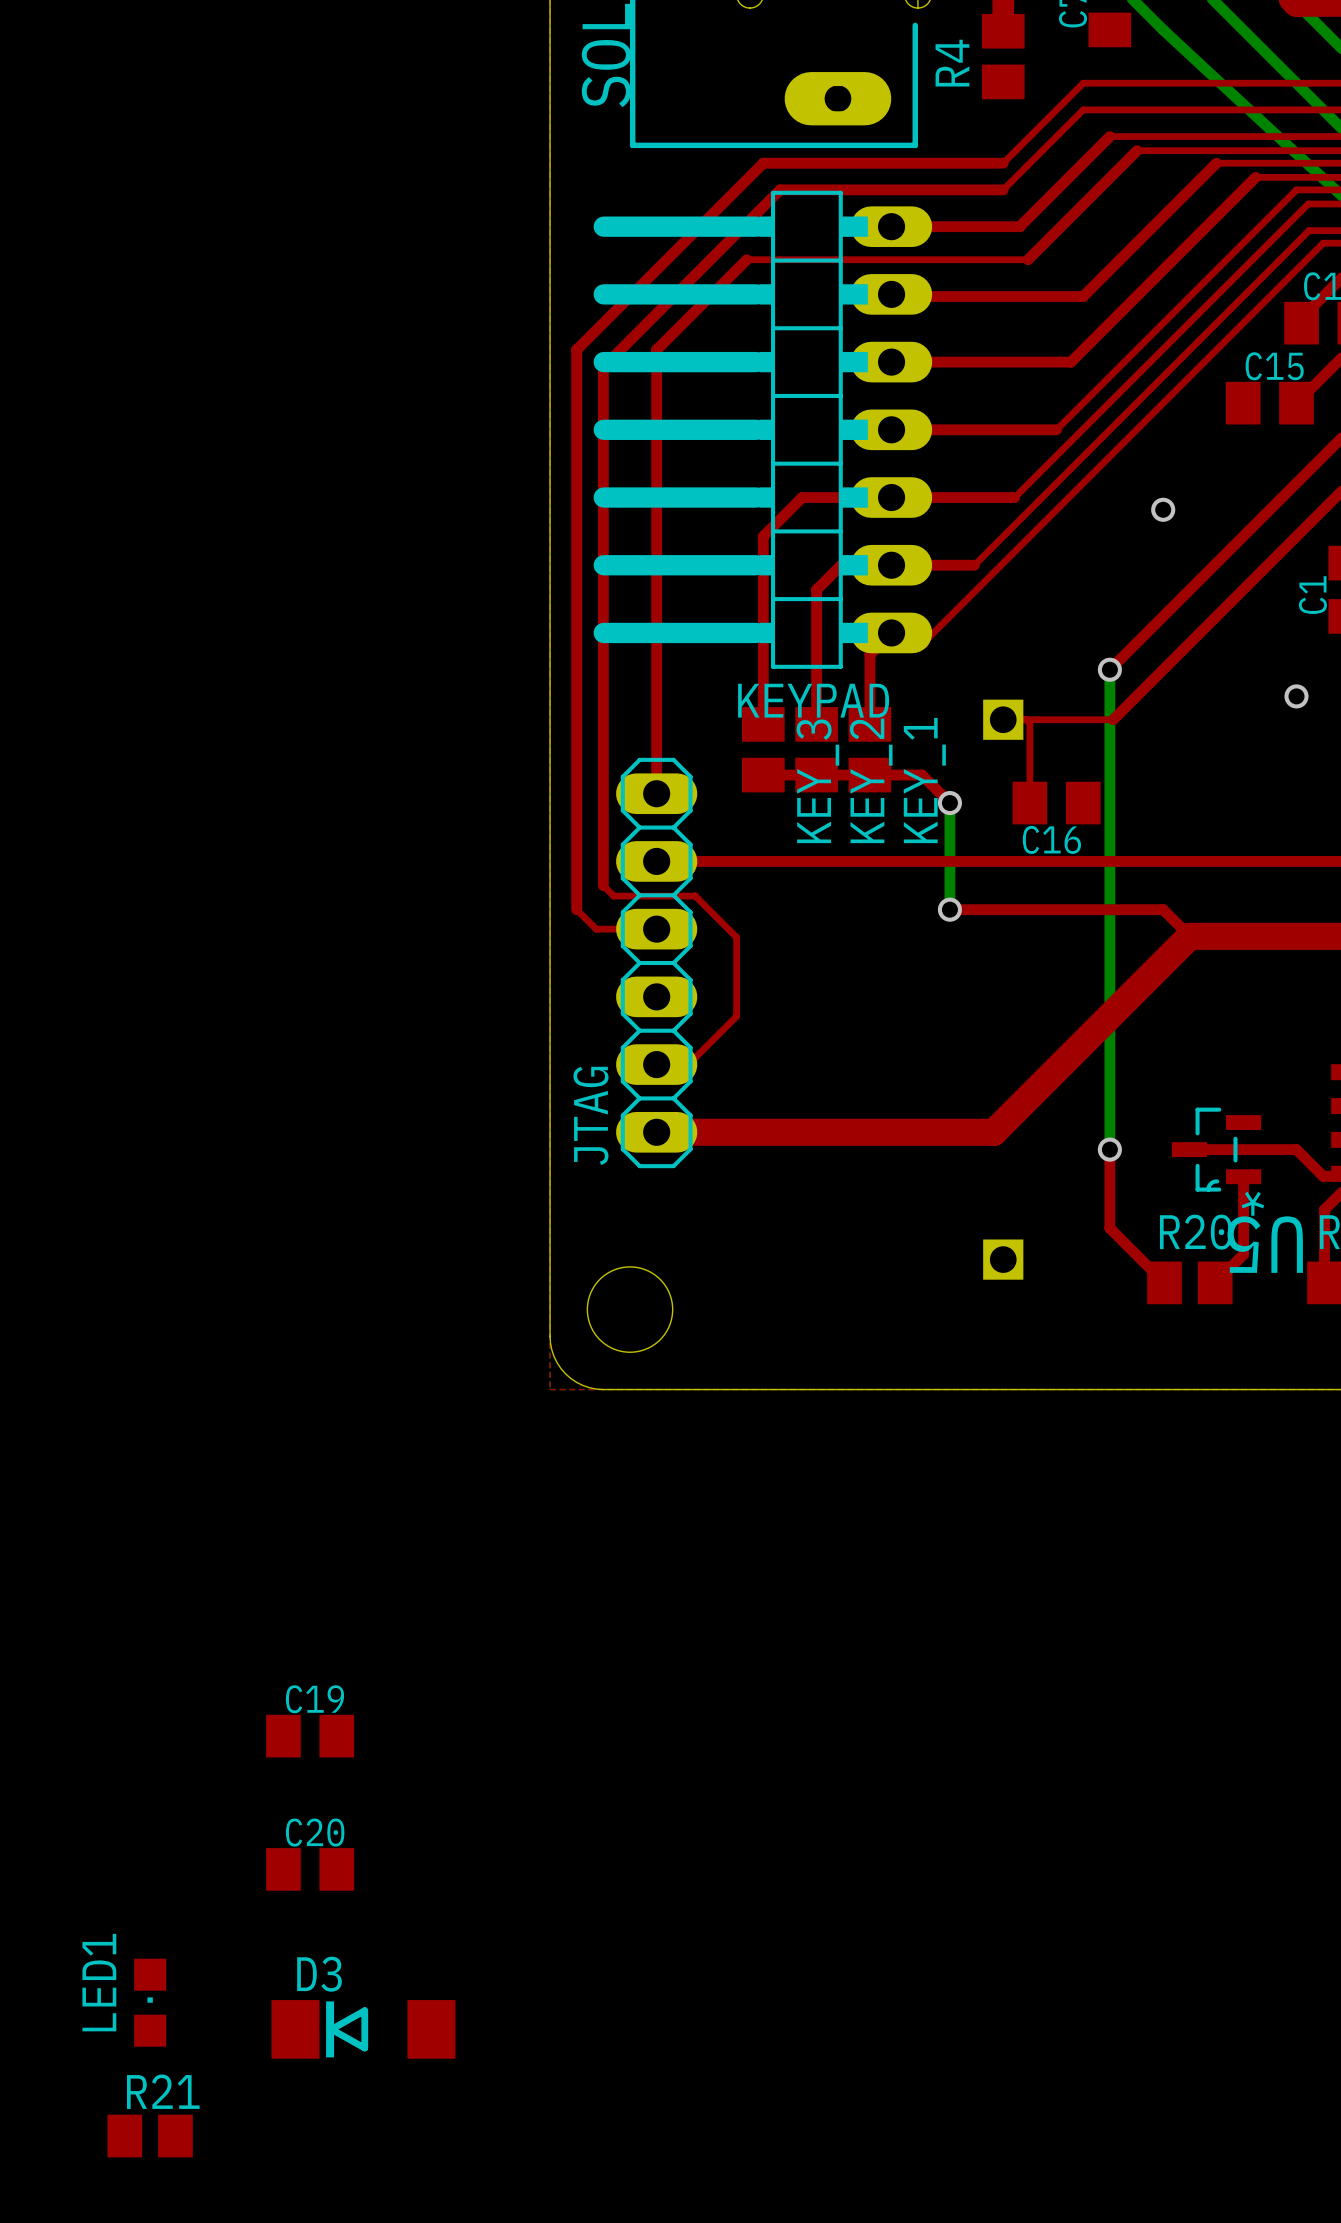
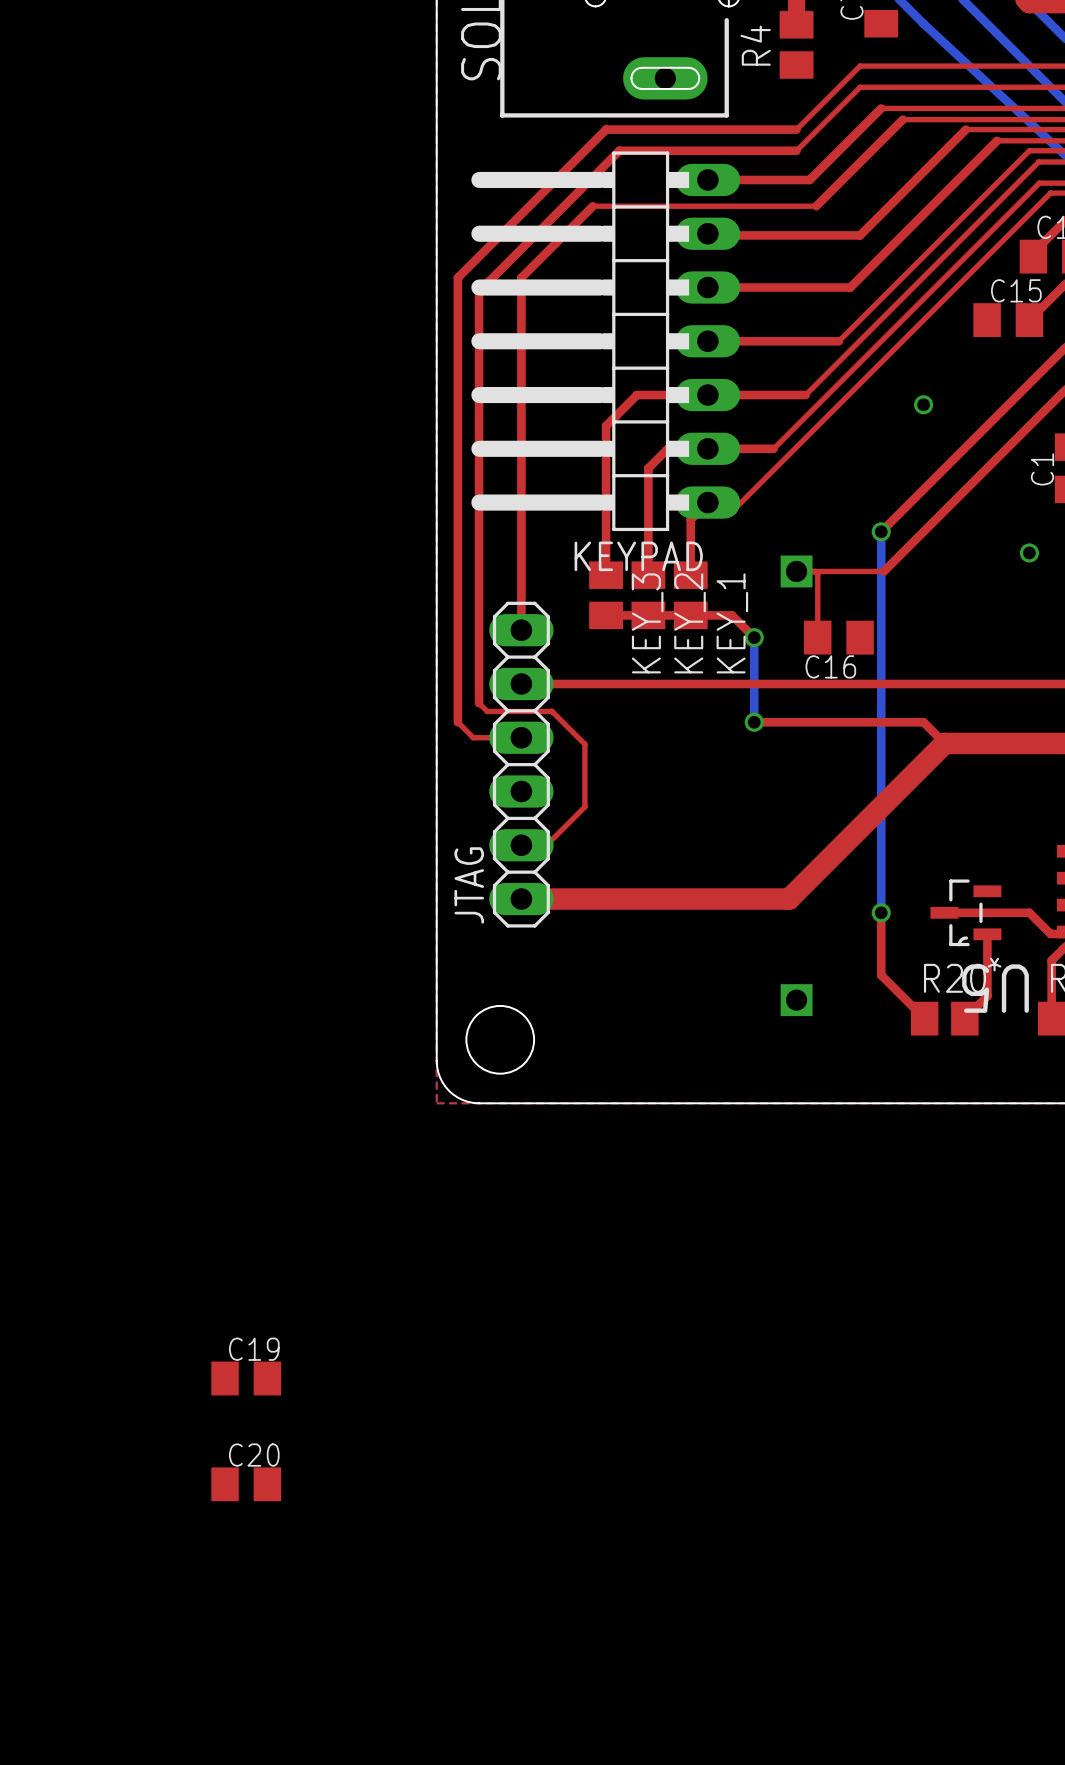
LED1: (150, 2002) -> none
D3: (363, 2029) -> none
R21: (150, 2136) -> none

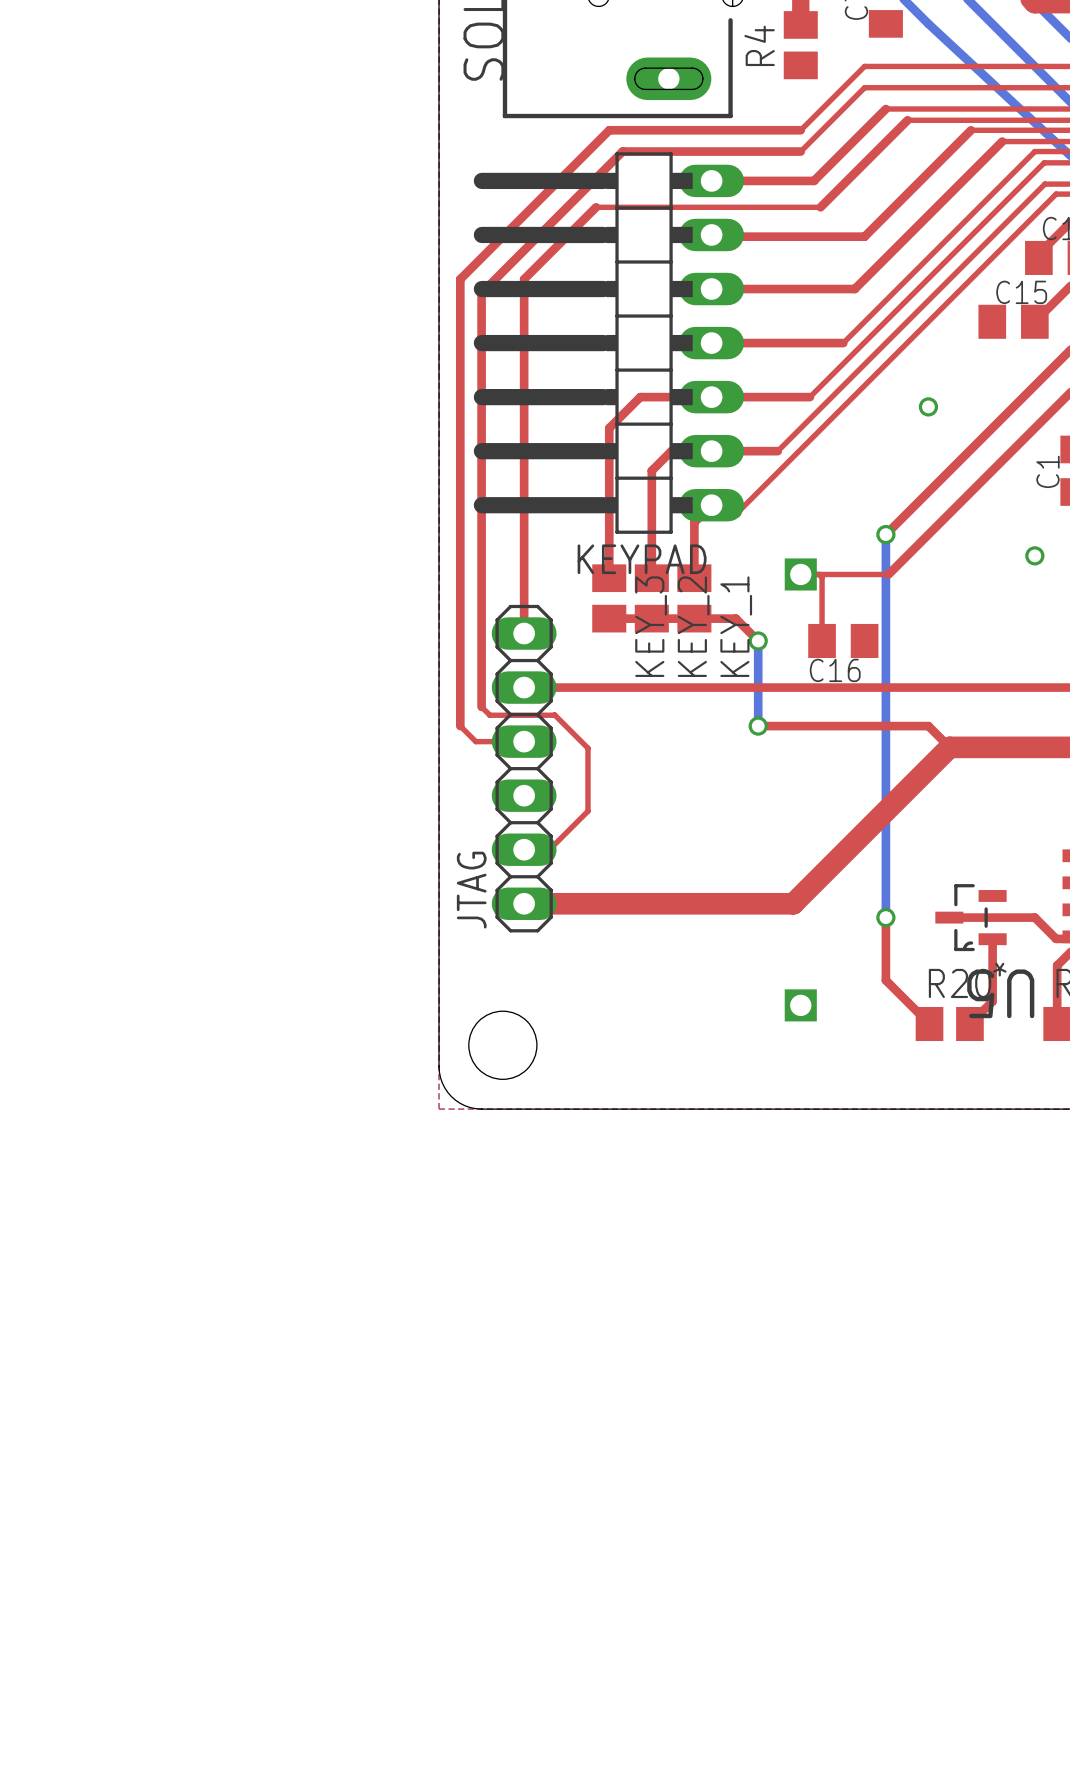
C19: (246, 1378) -> none
C20: (246, 1484) -> none

